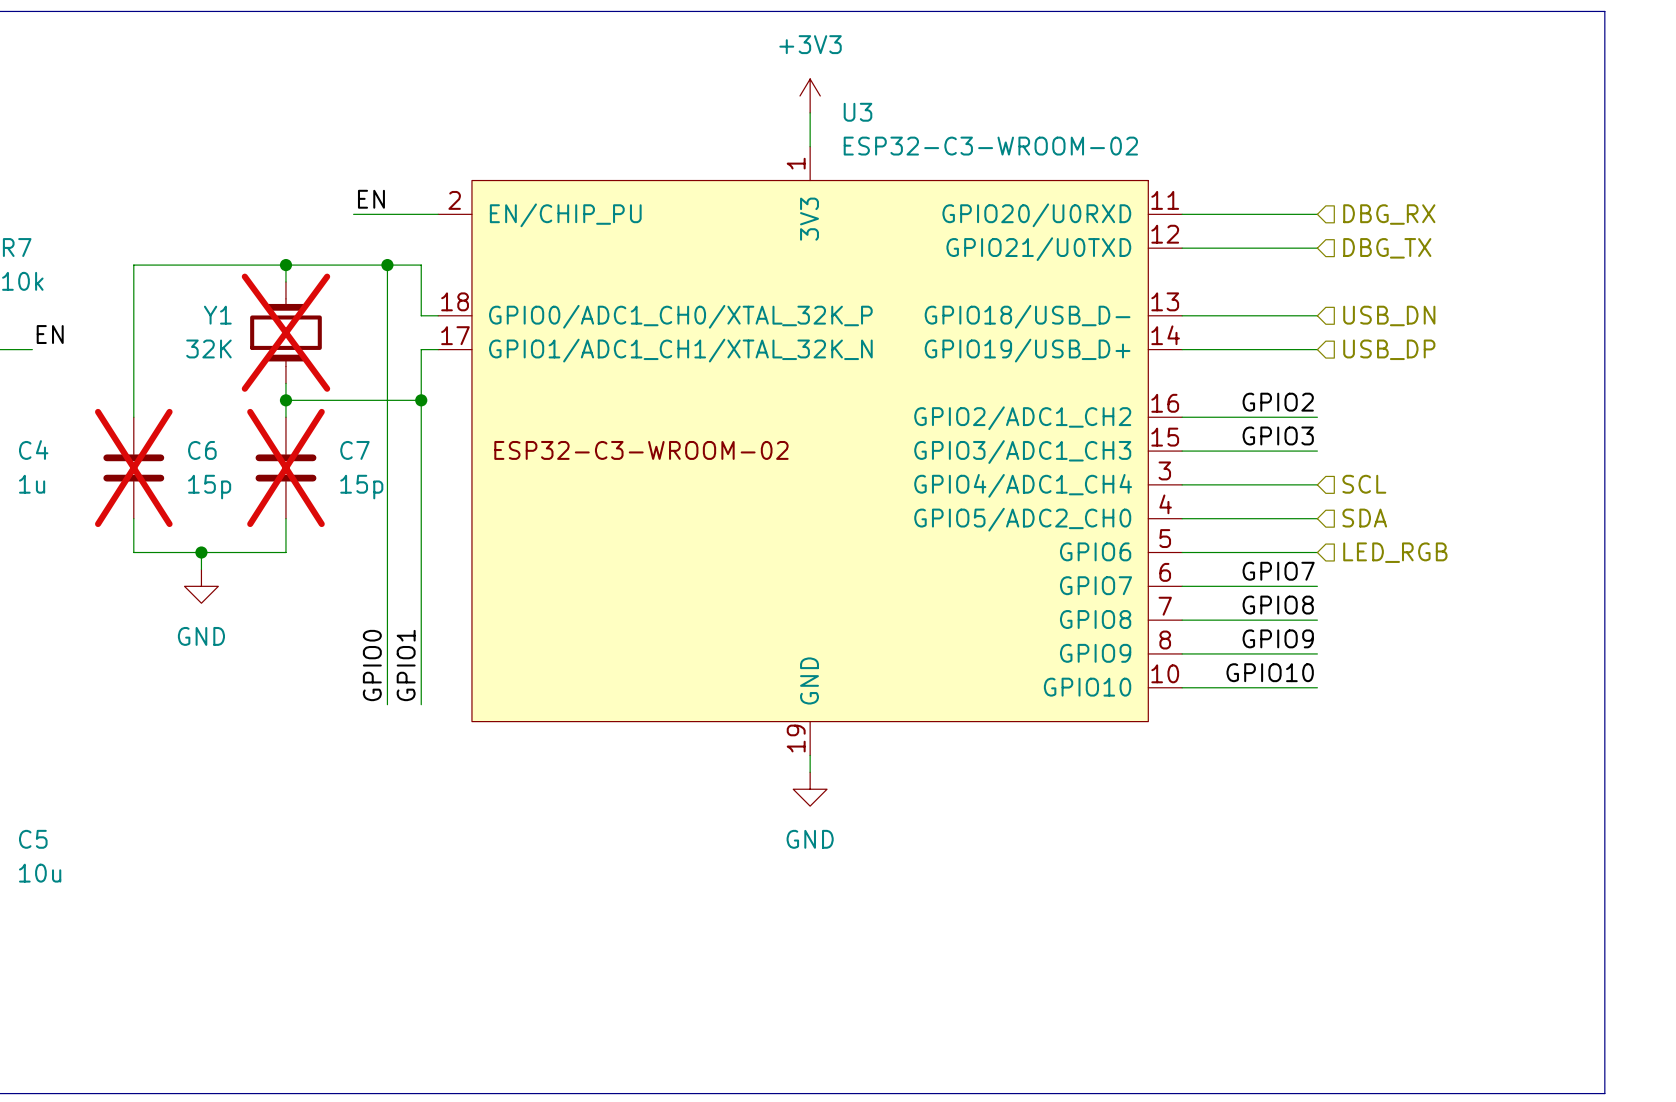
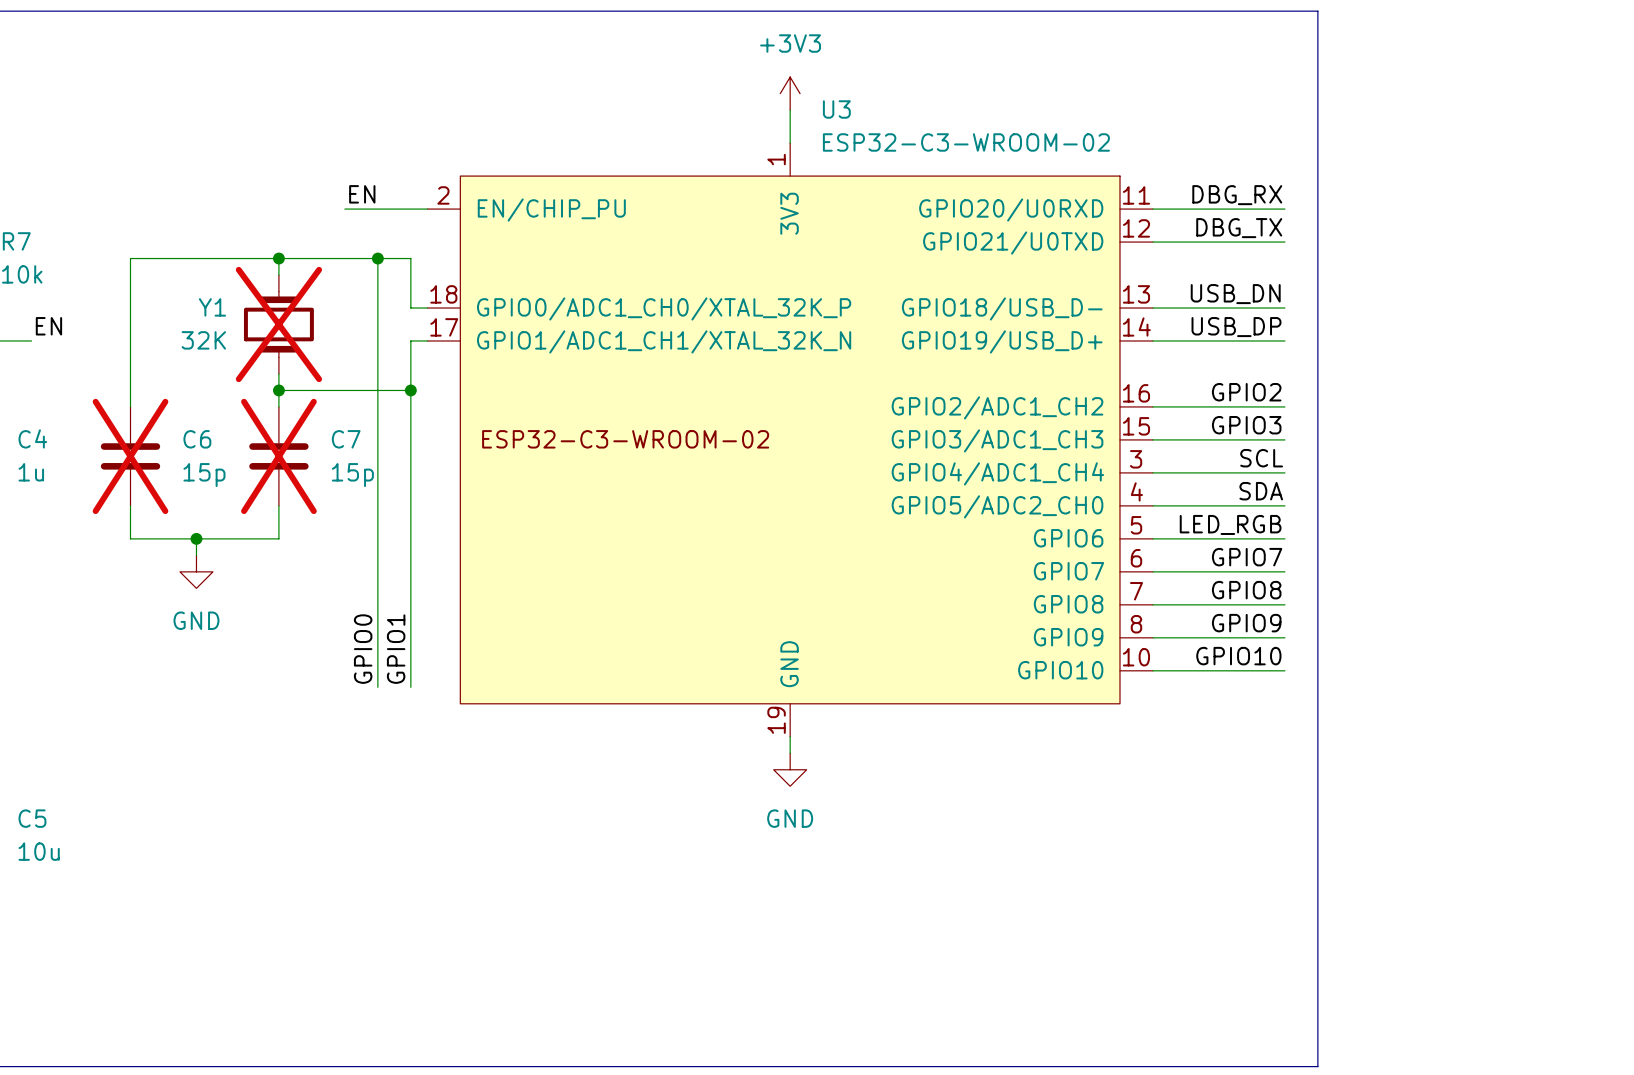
line: (1351, 11) (1604, 11) (1604, 1093) (1351, 1093) -> (1317, 11) (1317, 1066)
label: none -> DBG_RX (1237, 195)
hierarchical label: DBG_RX (1389, 214) -> none
label: none -> DBG_TX (1239, 228)
hierarchical label: DBG_TX (1387, 248) -> none
label: none -> USB_DN (1235, 294)
hierarchical label: USB_DN (1389, 315) -> none
label: none -> USB_DP (1236, 327)
hierarchical label: USB_DP (1389, 349) -> none
label: none -> SCL (1261, 458)
hierarchical label: SCL (1364, 484) -> none
label: none -> SDA (1261, 491)
hierarchical label: SDA (1364, 518) -> none
label: none -> LED_RGB (1230, 524)
hierarchical label: LED_RGB (1395, 552) -> none

